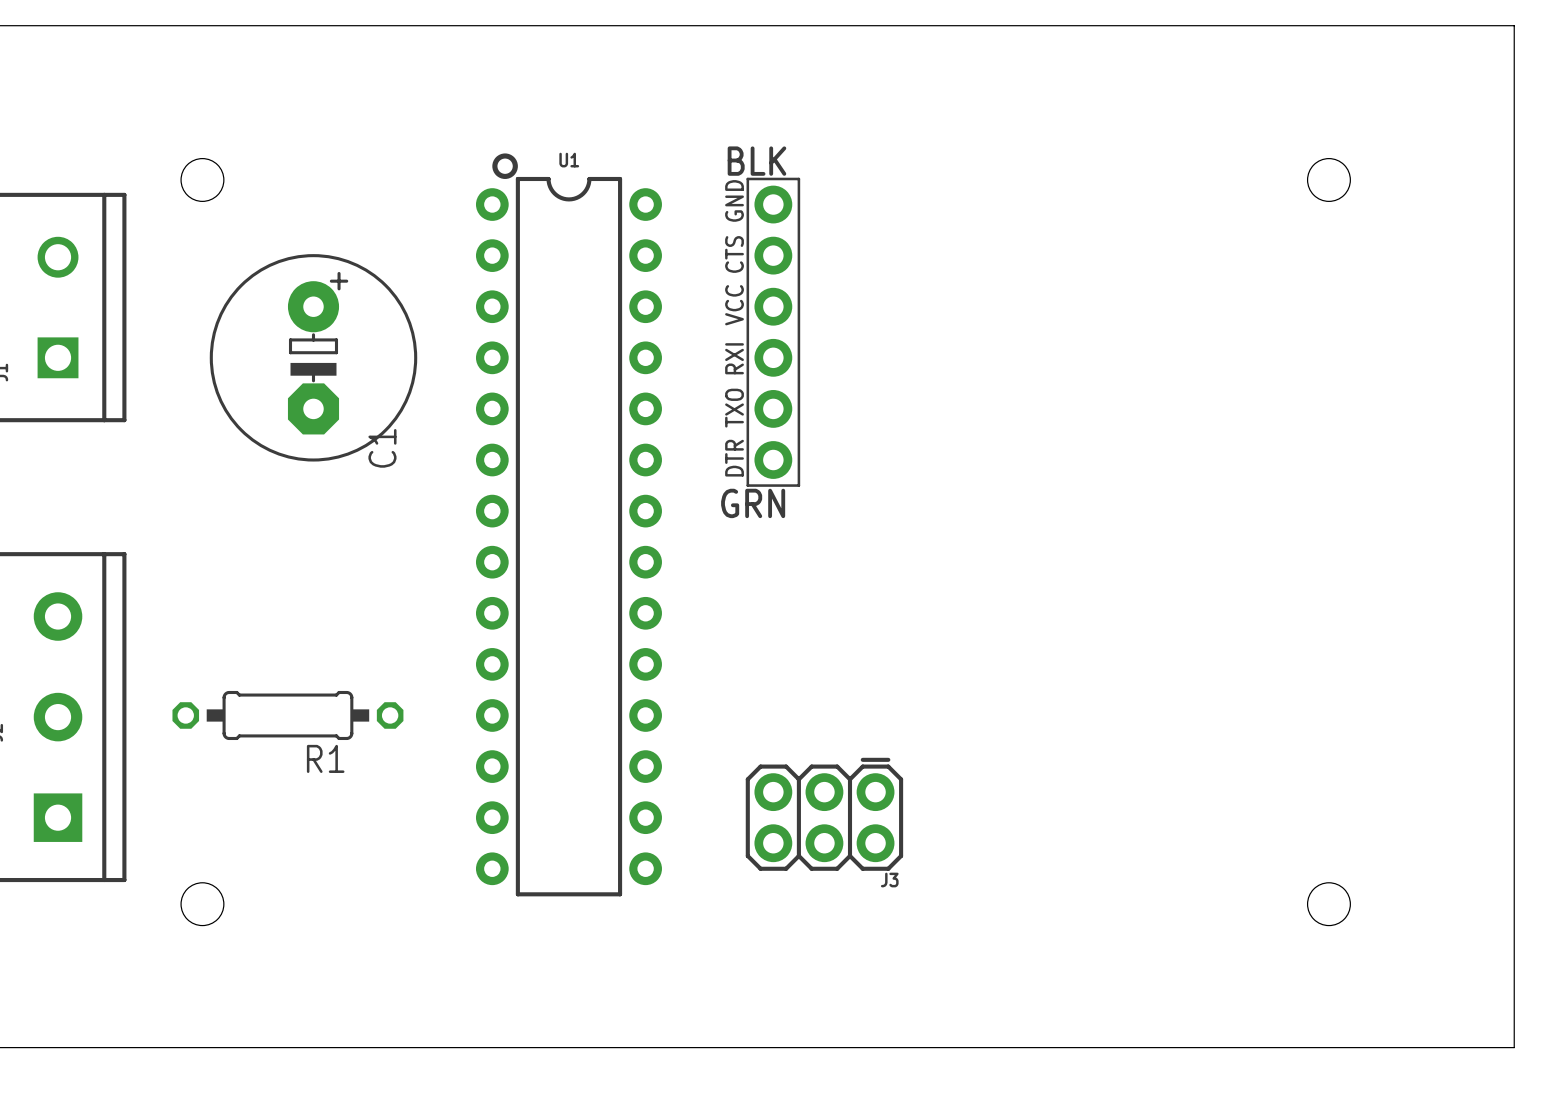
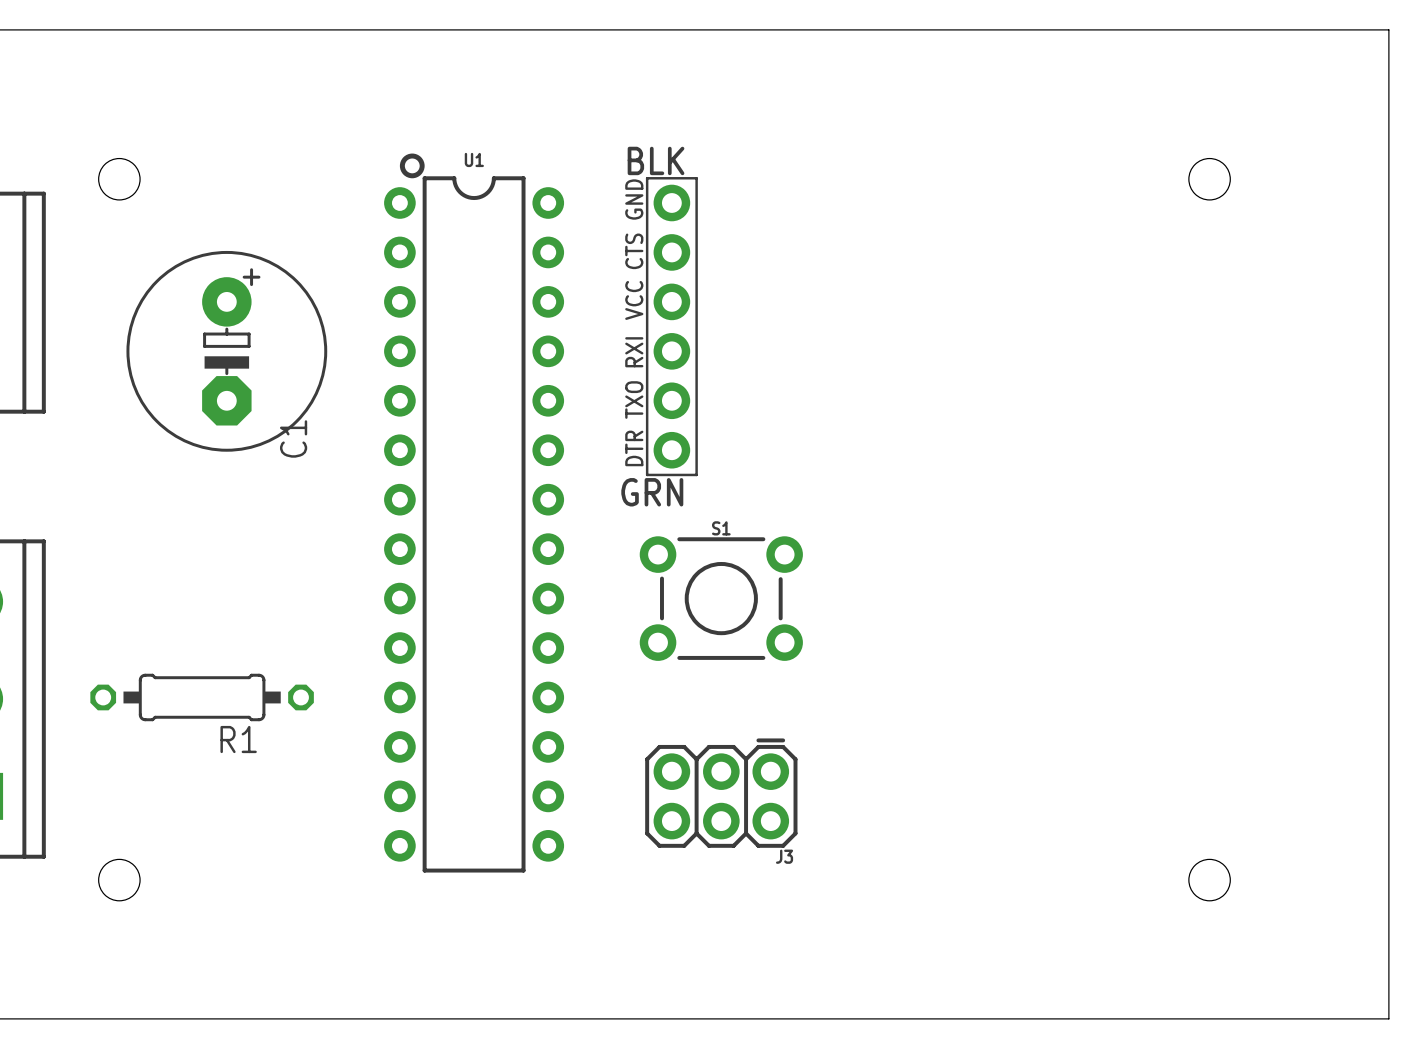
S1: none -> (721, 598)

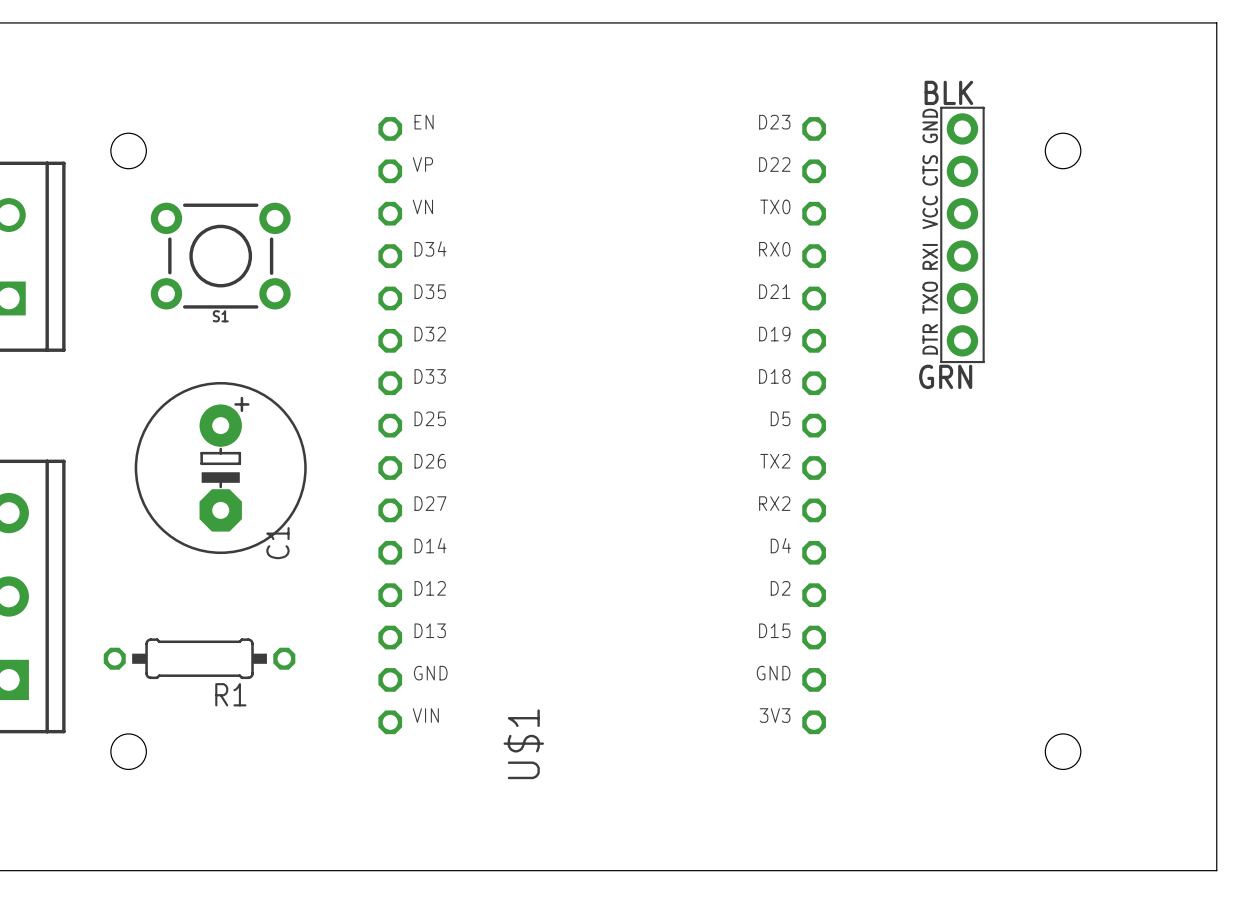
part position: (671, 326) -> (962, 234)
C1 position: (226, 351) -> (220, 468)
U$1: none -> (602, 425)
U1: (474, 513) -> none
S1 name position: S1 (721, 528) -> S1 (220, 316)
S1 position: (721, 598) -> (220, 256)
R1 position: (202, 697) -> (199, 658)
J3: (721, 793) -> none

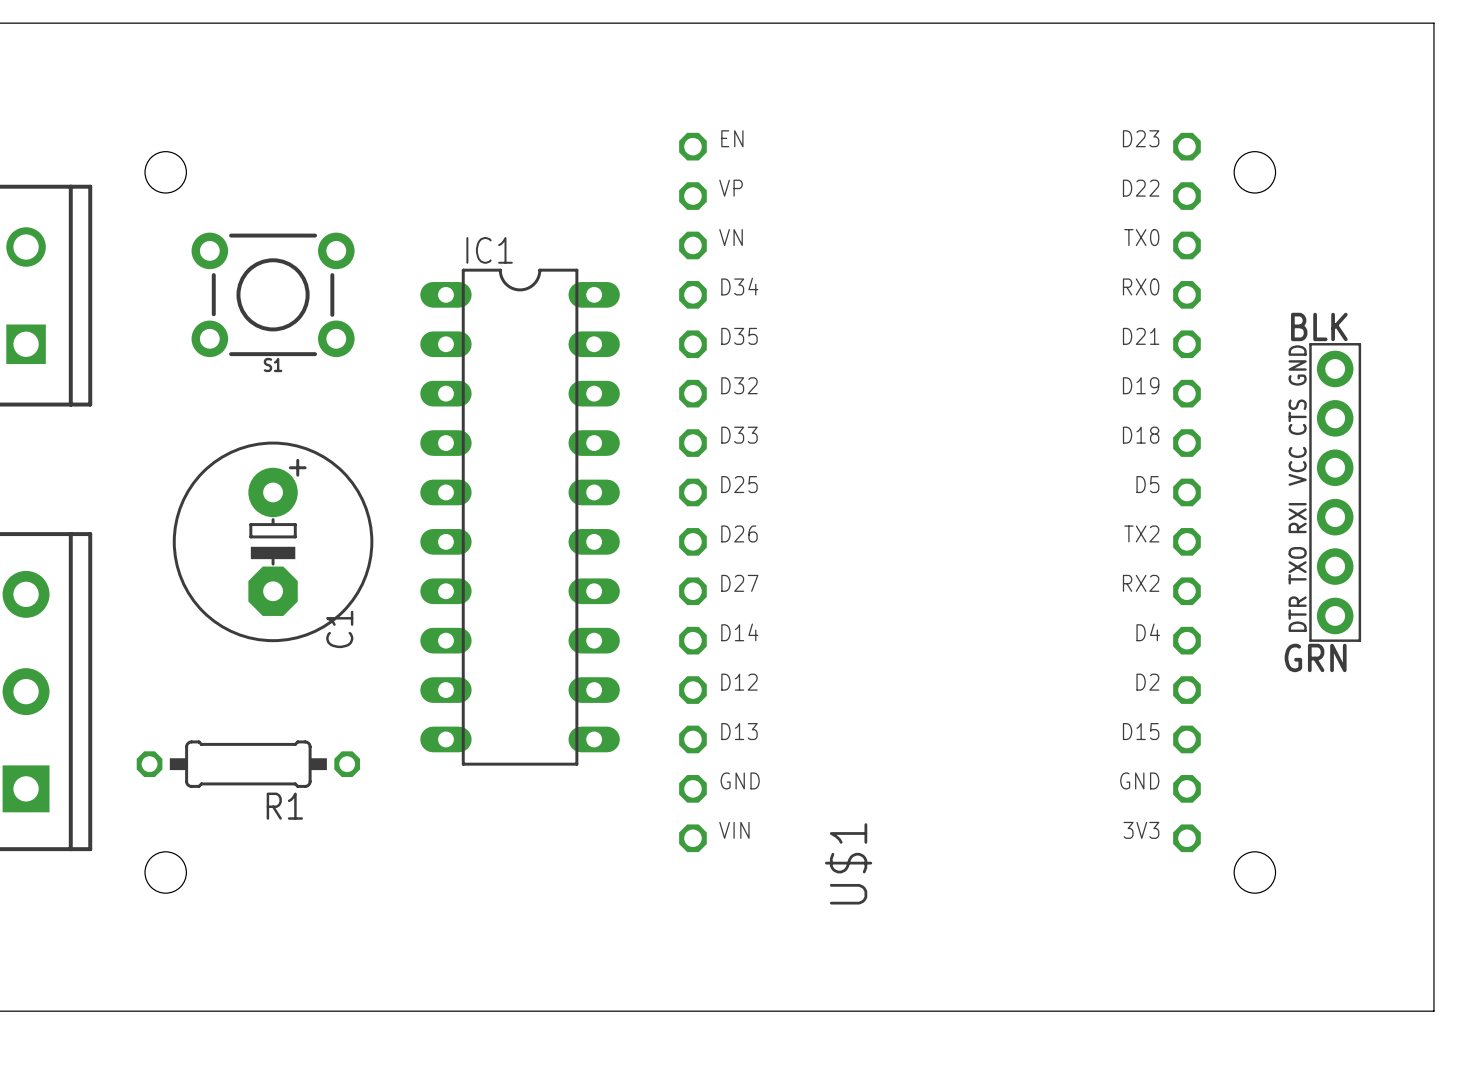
part position: (962, 234) -> (1335, 492)
U$1 position: (602, 425) -> (939, 492)
IC1: none -> (520, 517)

